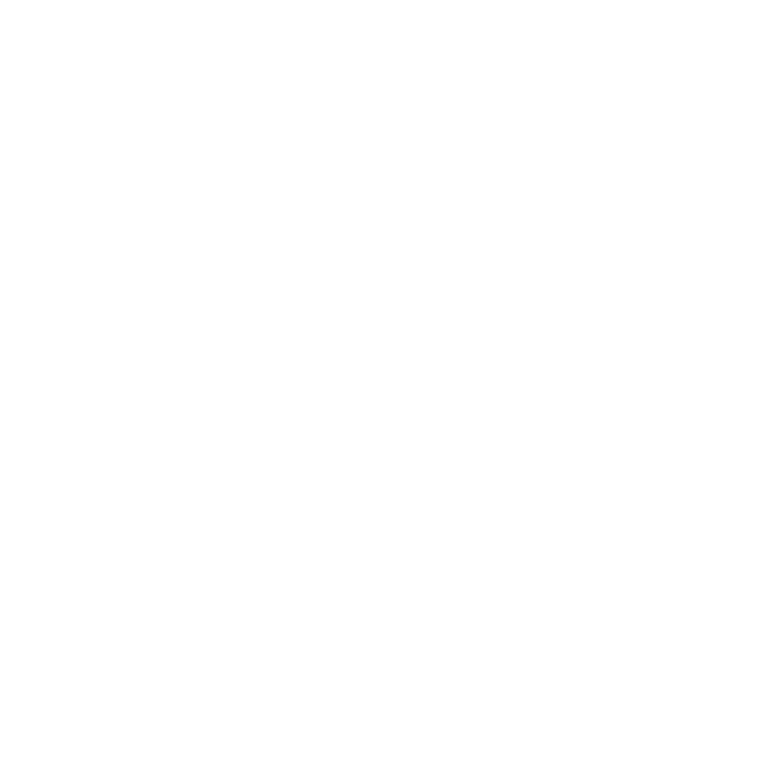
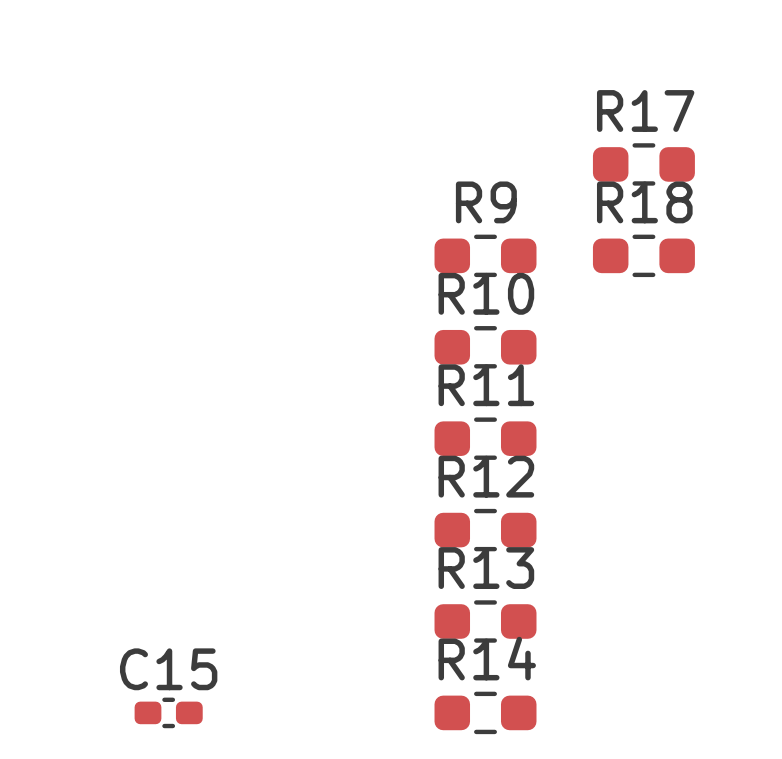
R17: none -> (643, 164)
R9: none -> (485, 255)
R18: none -> (643, 255)
R10: none -> (485, 347)
R11: none -> (485, 438)
R12: none -> (485, 530)
R13: none -> (485, 621)
C15: none -> (168, 712)
R14: none -> (485, 712)

